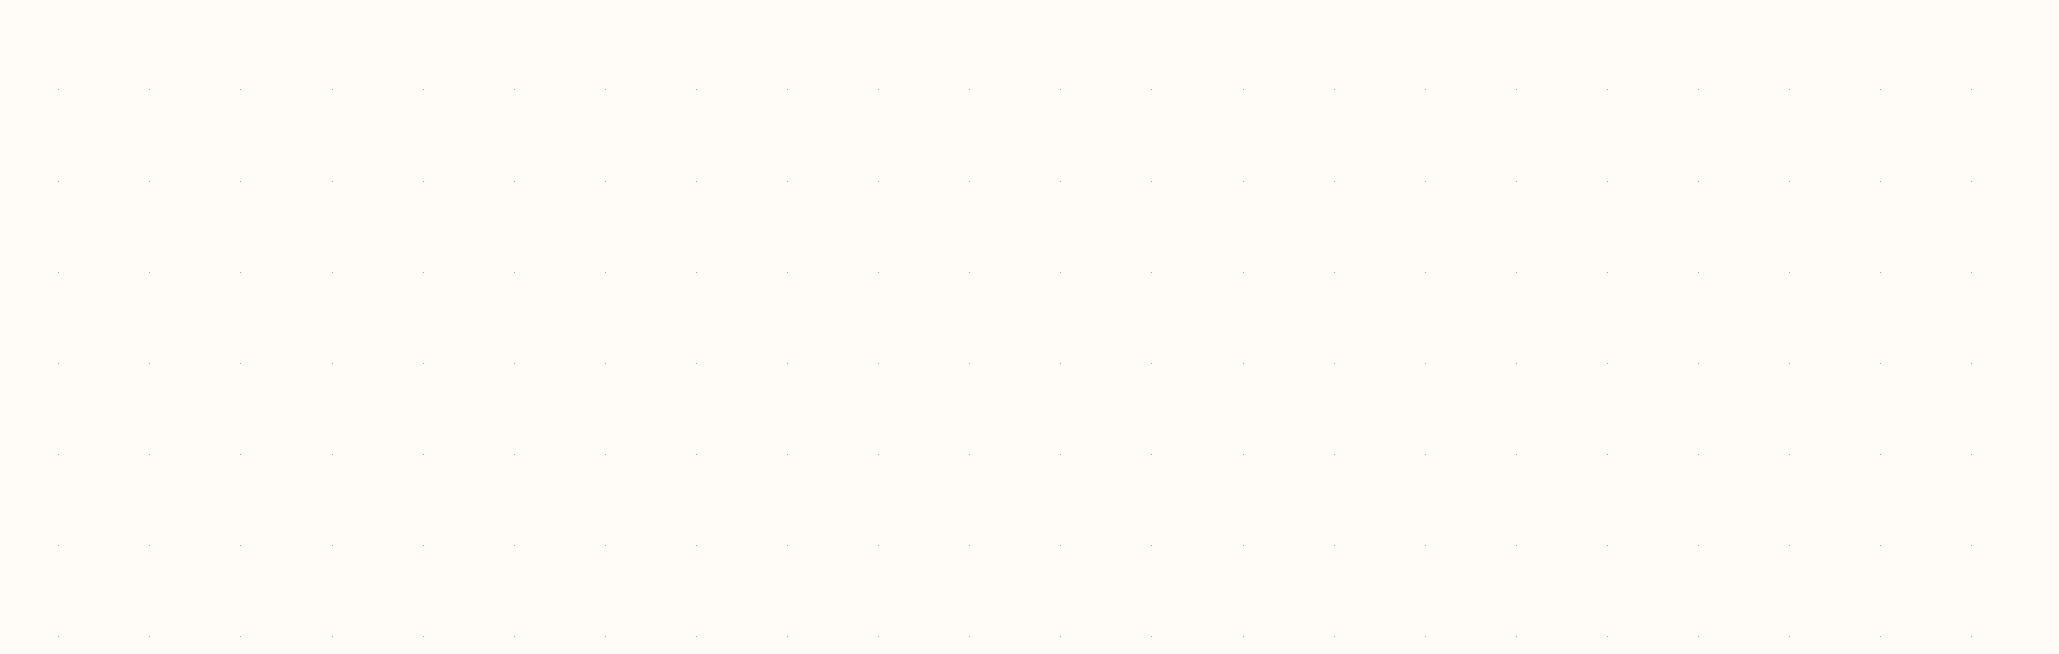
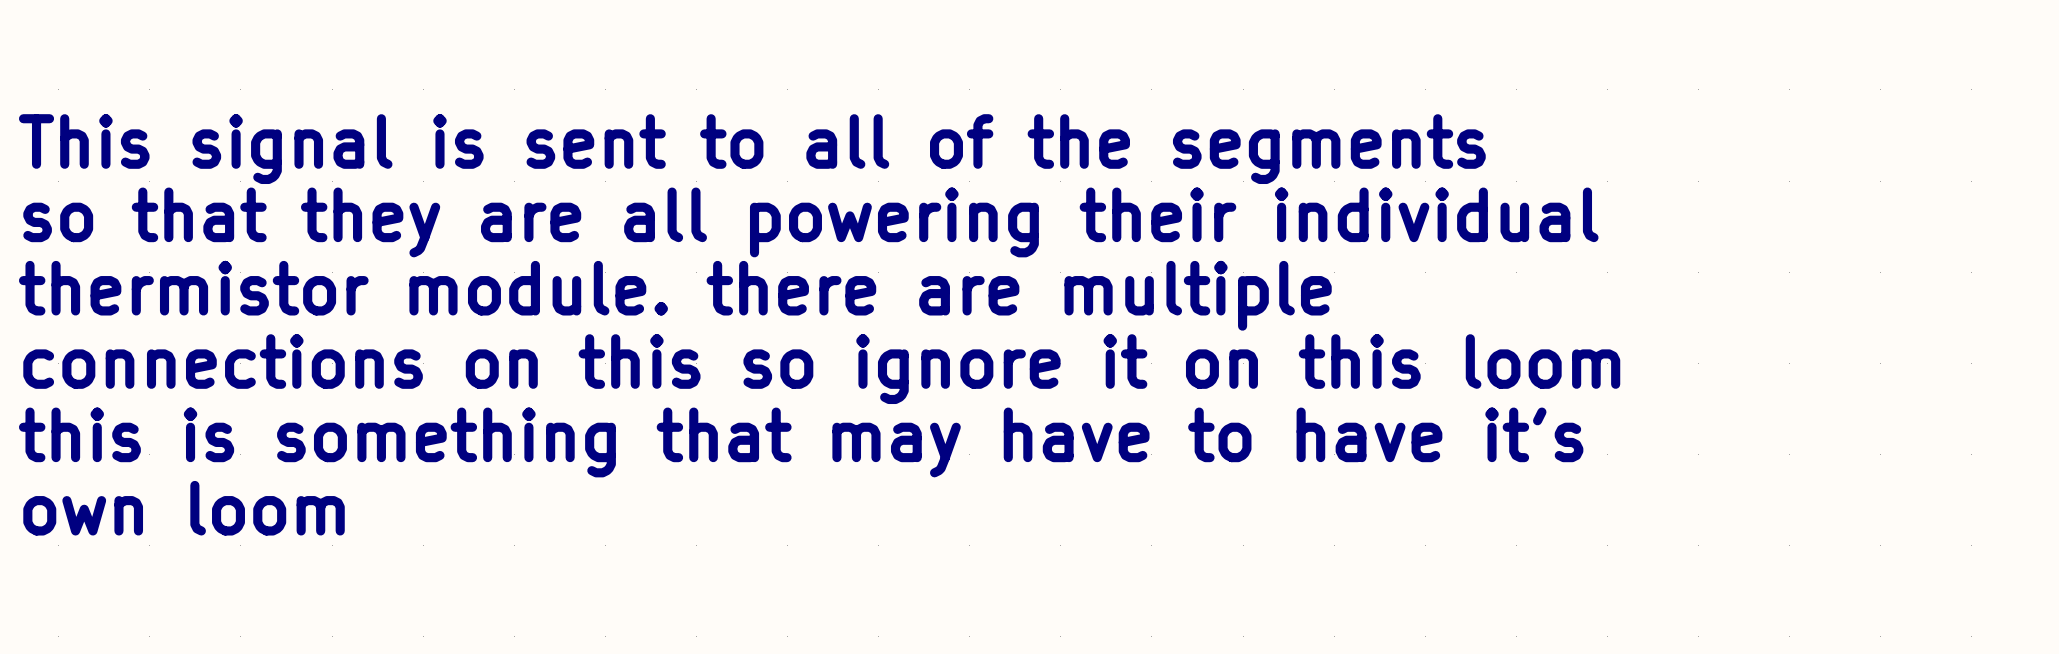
text: none -> This signal is sent to all of the segments (752, 149)
text: none -> so that they are all powering their individual (810, 222)
text: none -> thermistor module. there are multiple (675, 295)
text: none -> connections on this so ignore it on this loom (821, 369)
text: none -> this is something that may have to have it's (801, 442)
text: none -> own loom (184, 508)

